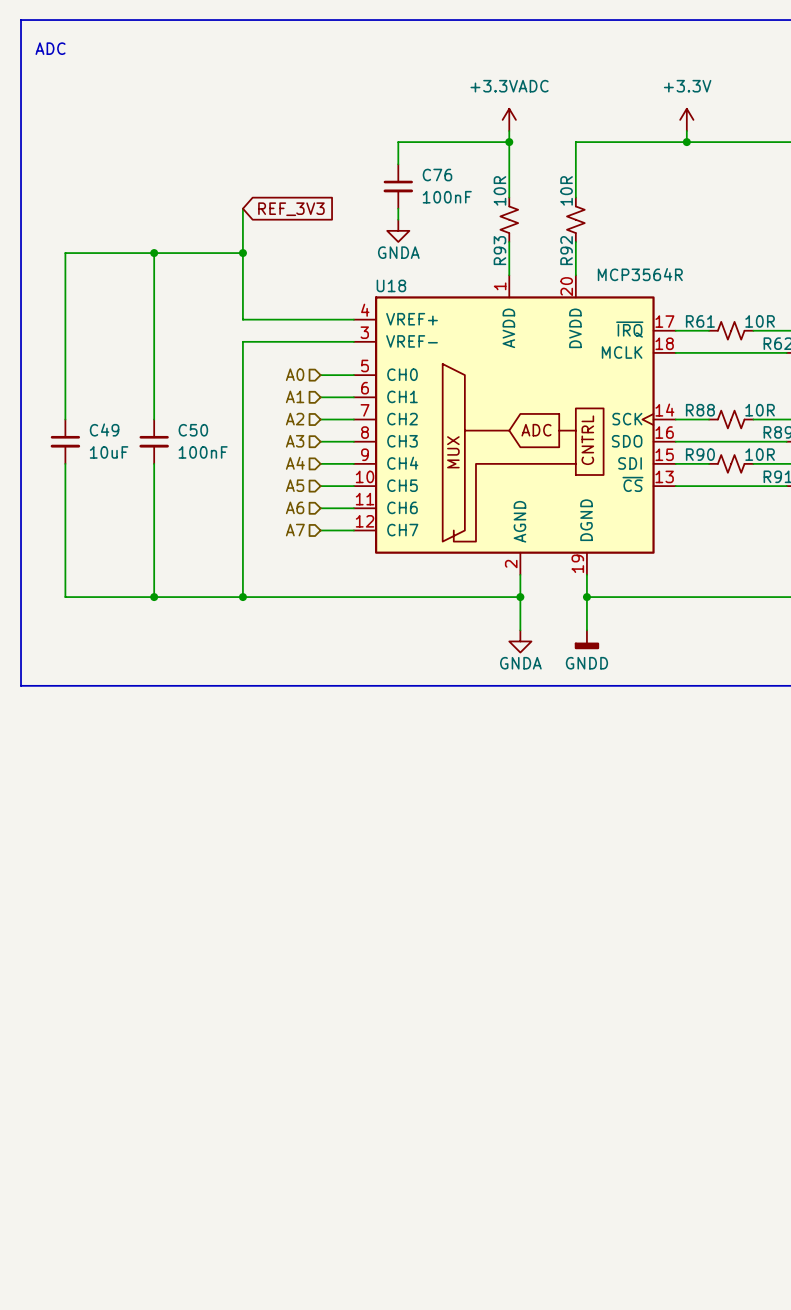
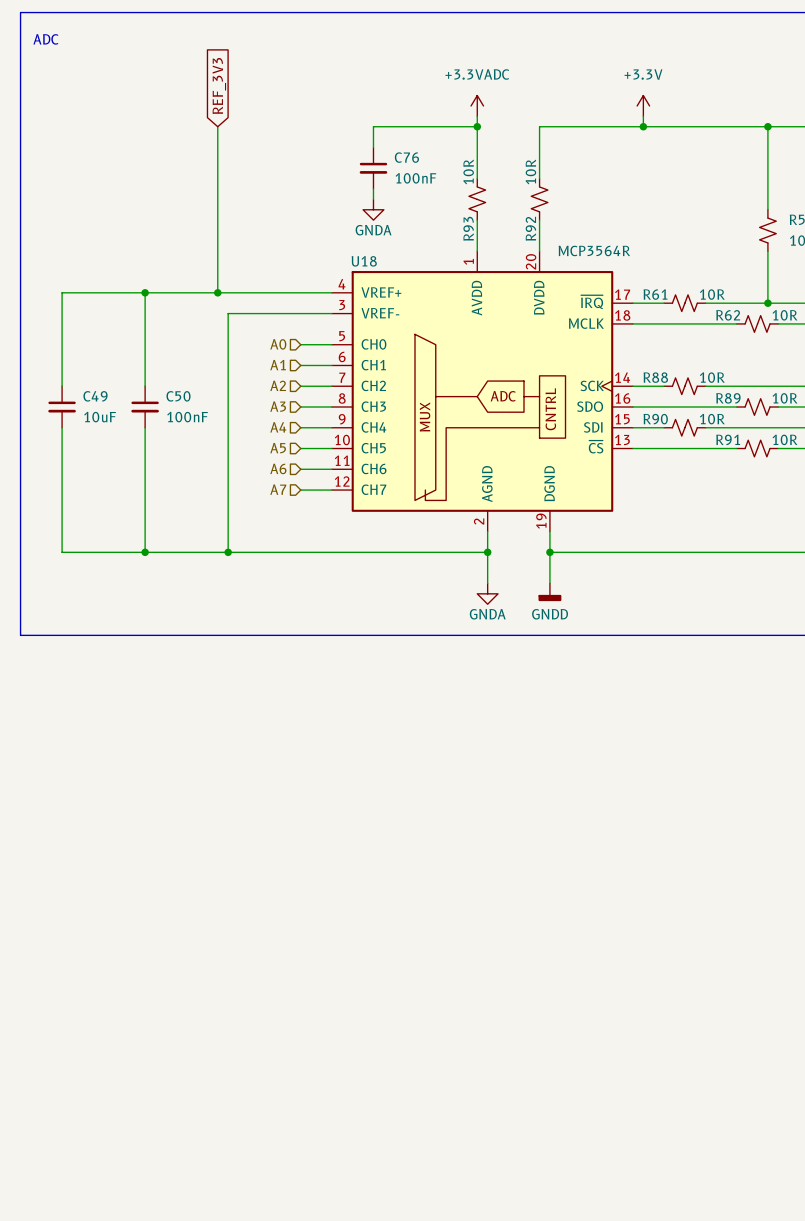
wire: none -> (217, 126) (217, 292)
wire: (242, 208) (242, 319) -> none
global label rotation: 0° (291, 209) -> 90° counterclockwise (219, 85)
global label position: REF_3V3 (291, 209) -> REF_3V3 (219, 85)
wire: (154, 253) (154, 319) -> none
junction: (154, 253) -> none
wire: (242, 253) (65, 253) (65, 319) -> (228, 292) (62, 292)
junction: (242, 253) -> none
junction: none -> (145, 292)
junction: none -> (217, 292)

